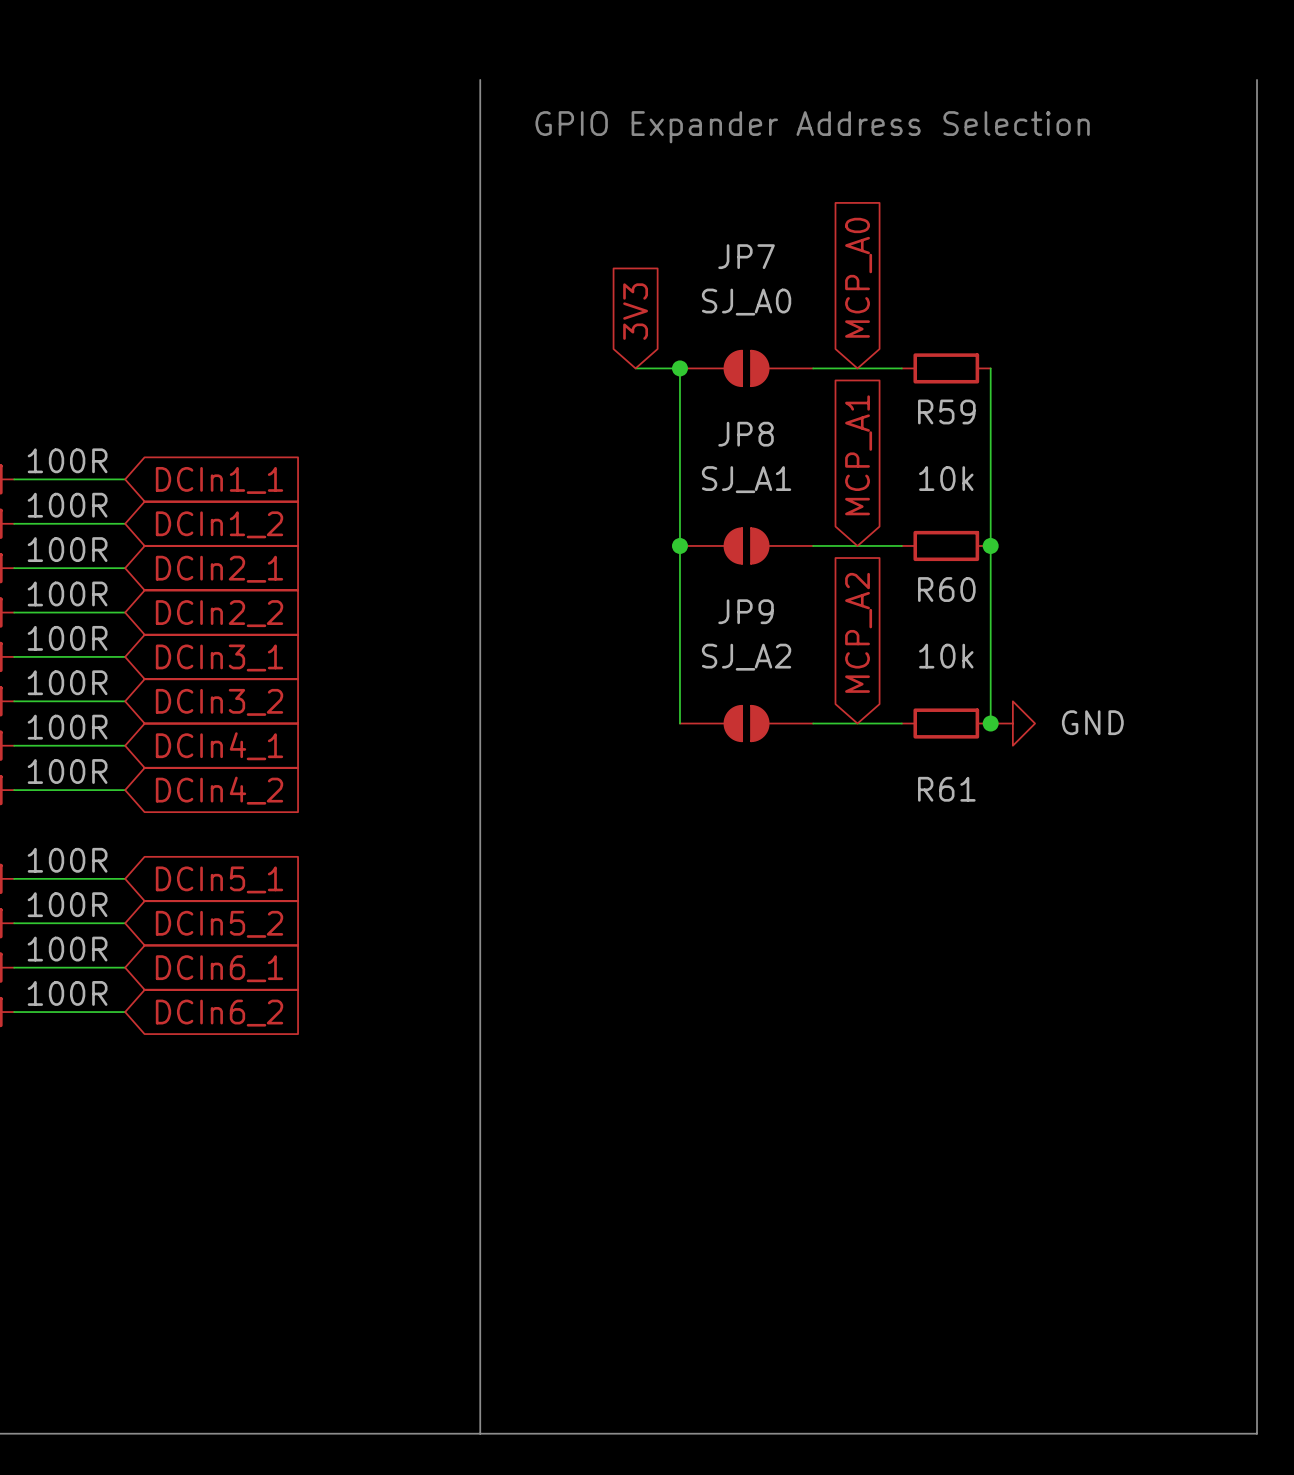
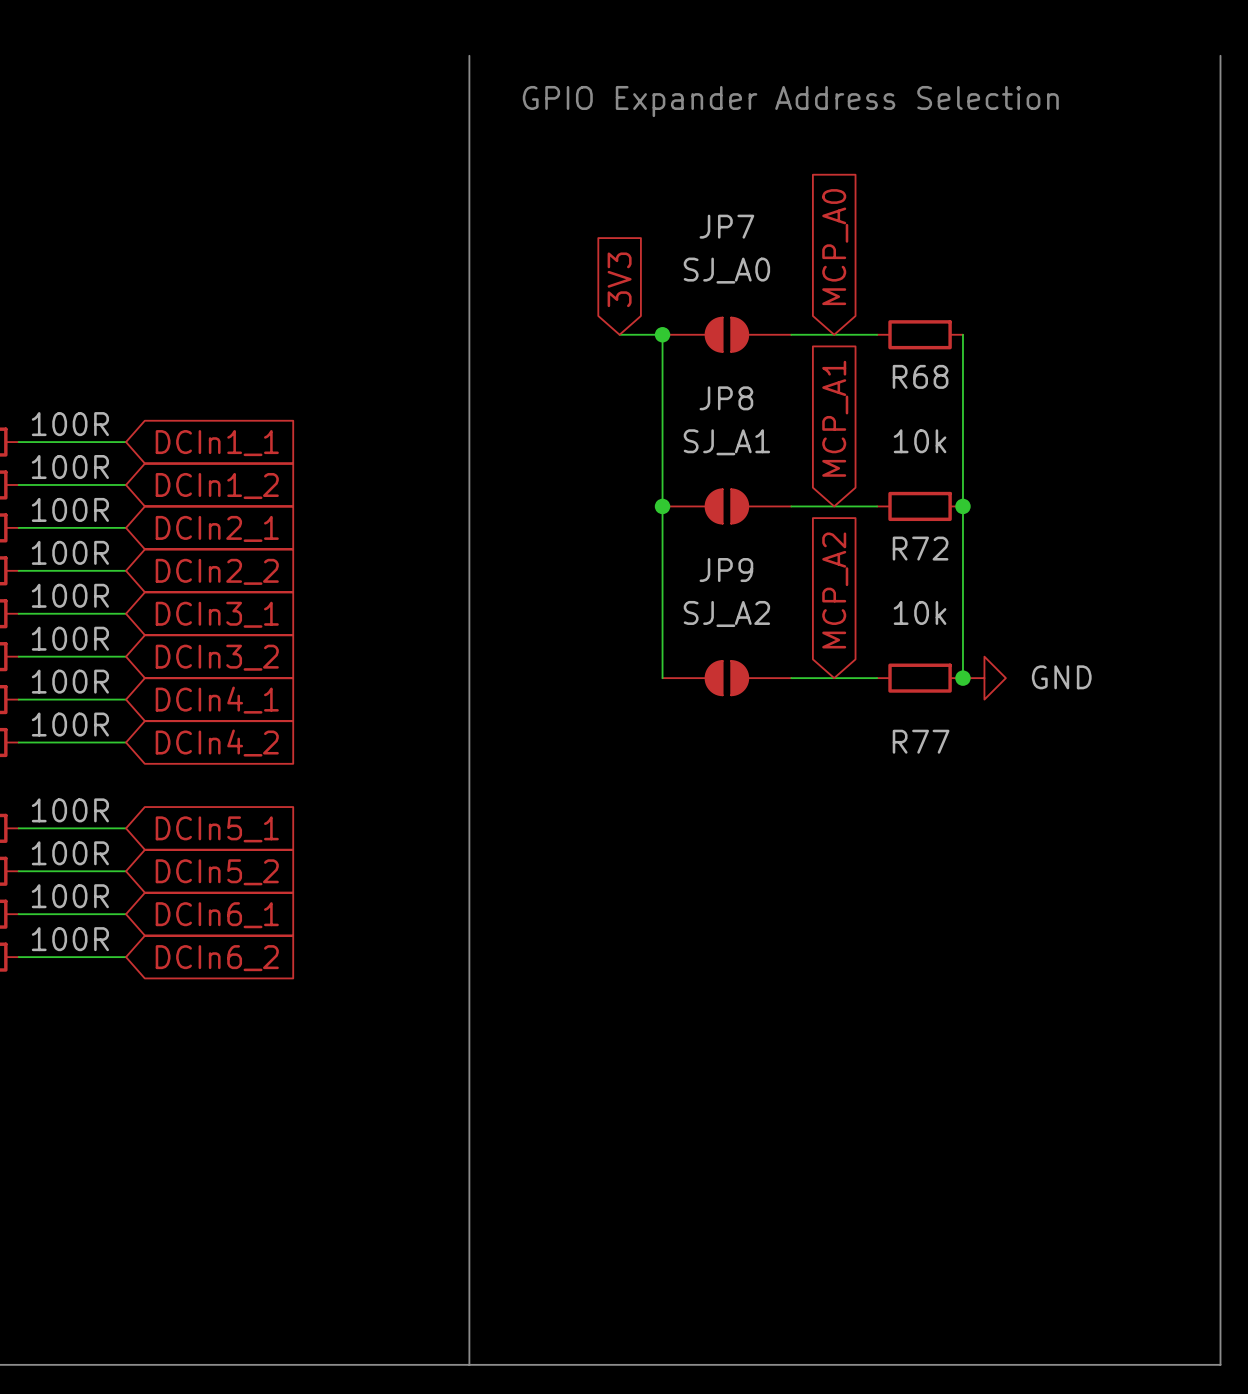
R59 name: R59 (946, 411) -> R68 (920, 376)
R60 name: R60 (946, 589) -> R72 (920, 548)
R61 name: R61 (946, 789) -> R77 (921, 741)

